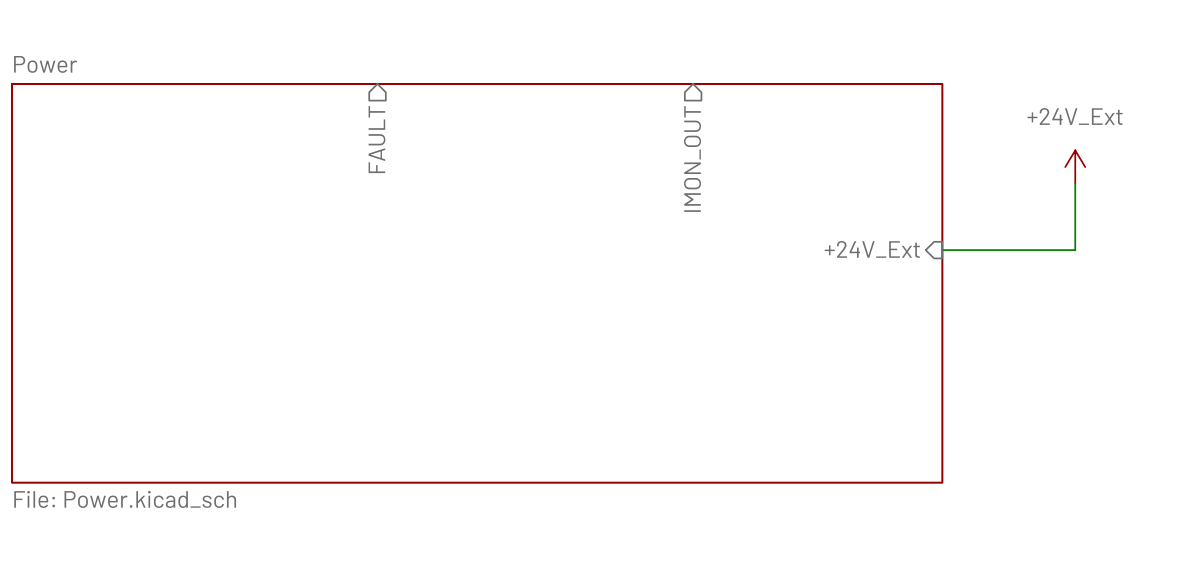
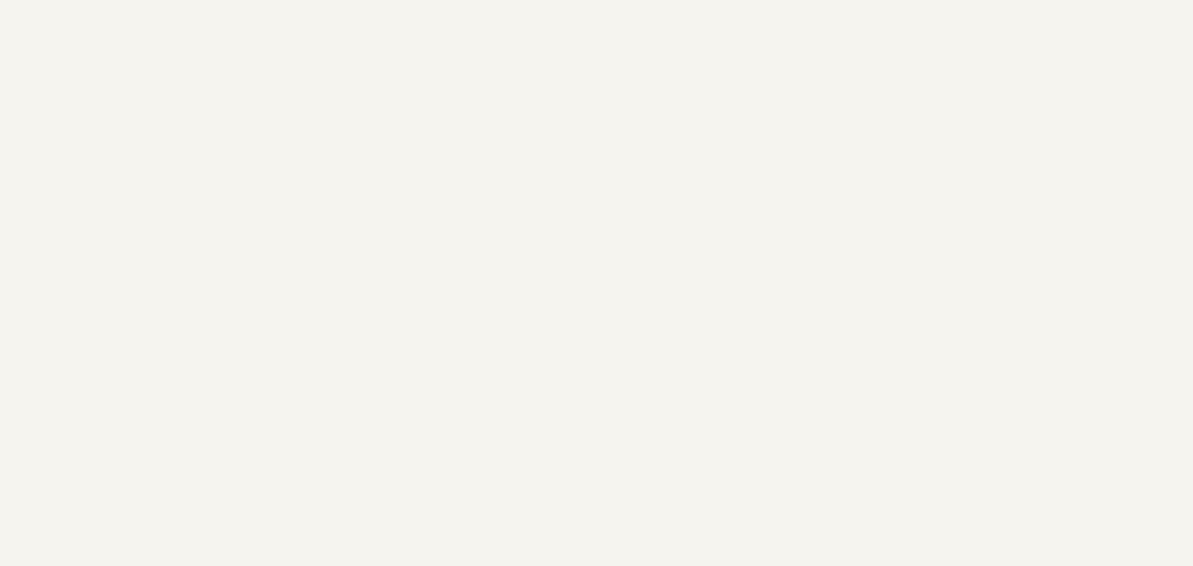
sheet pin: FAULT (376, 139) -> none
sheet pin: IMON_OUT (692, 159) -> none
power symbol: +24V_Ext (1075, 167) -> none
wire: (1075, 183) (1075, 250) (942, 250) -> none
sheet pin: +24V_Ext (872, 249) -> none
sheet Power: File: Power.kicad_sch (477, 283) -> none

